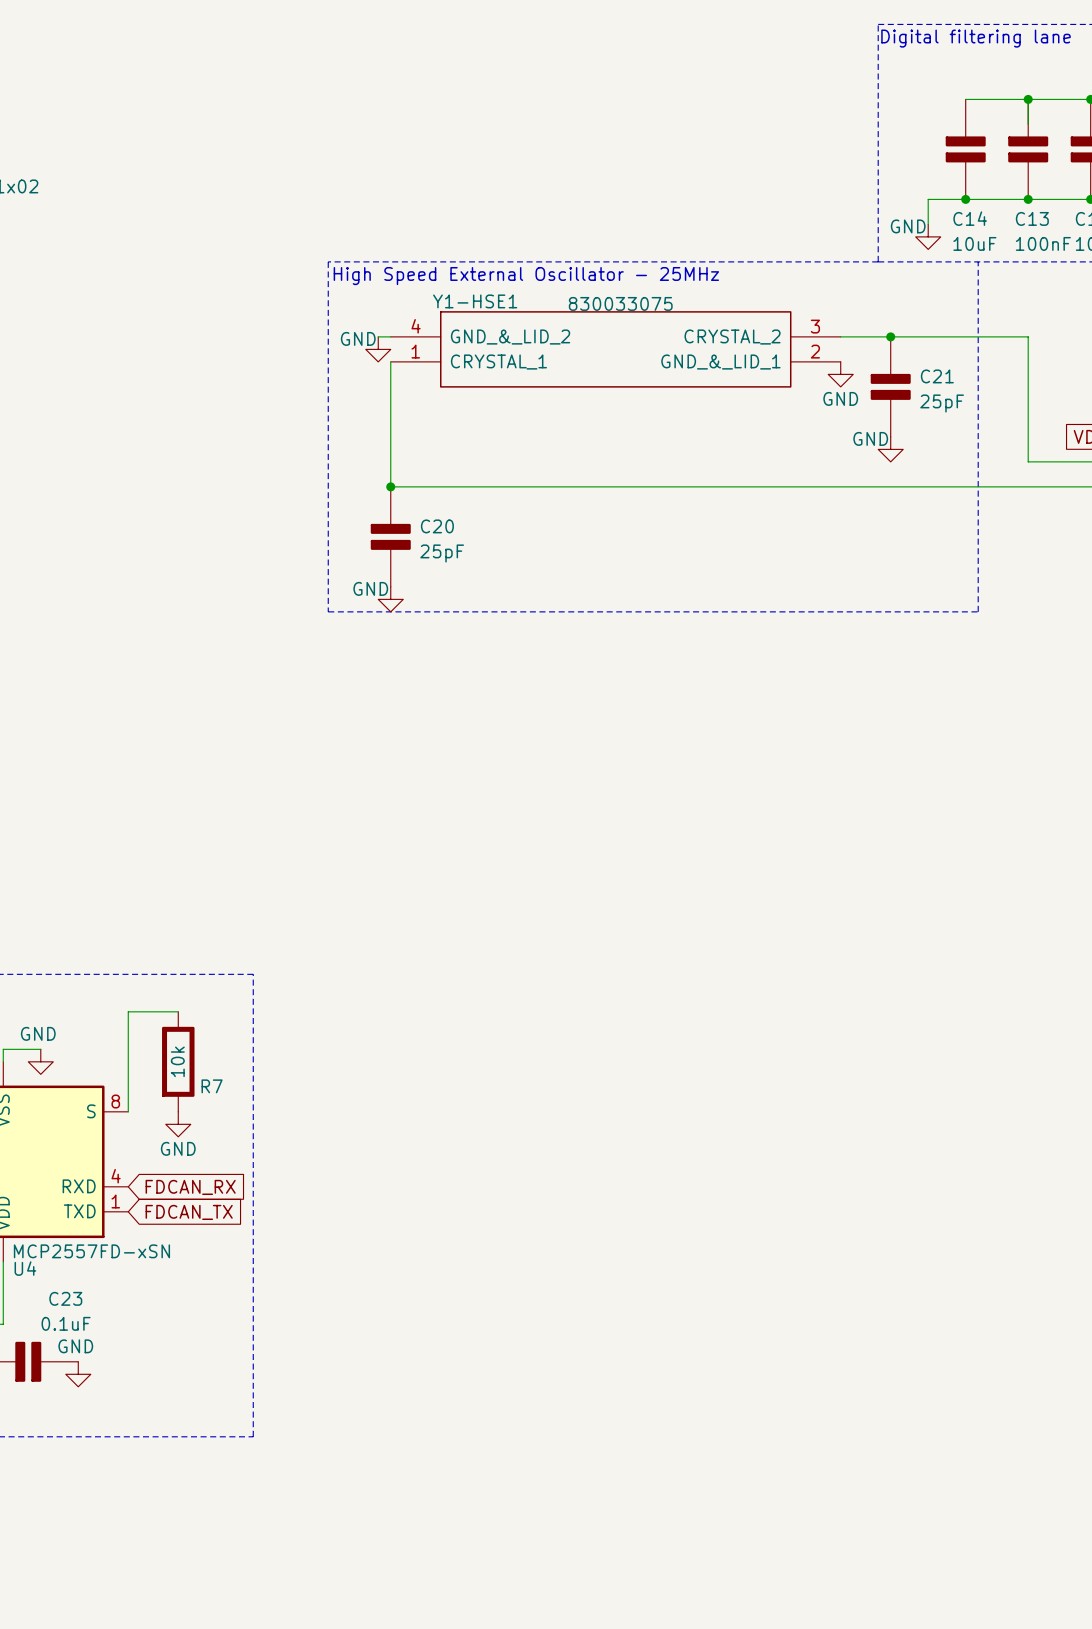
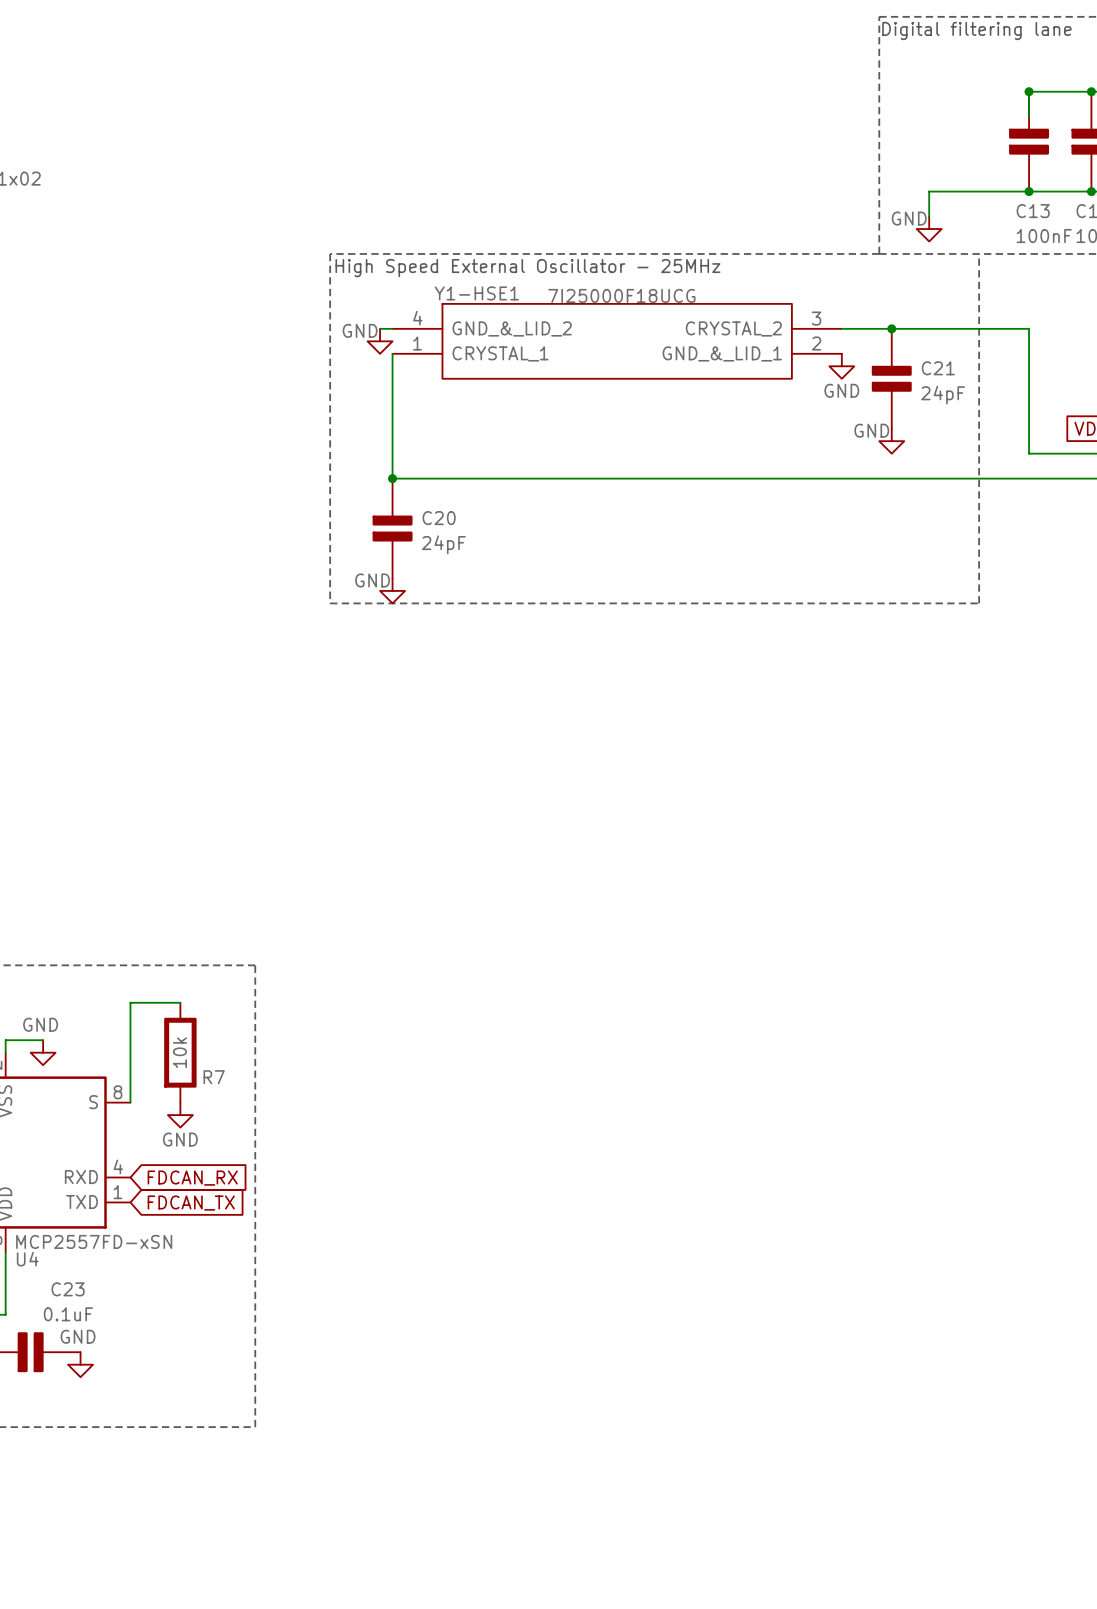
wire: (965, 99) (1028, 99) -> none
C14: 10uF (965, 149) -> none
junction: (965, 199) -> none
Y1-HSE1 value: 830033075 (620, 303) -> 7I25000F18UCG (621, 295)
C21 value: 25pF (942, 403) -> 24pF (943, 395)
C20 value: 25pF (442, 553) -> 24pF (443, 544)

